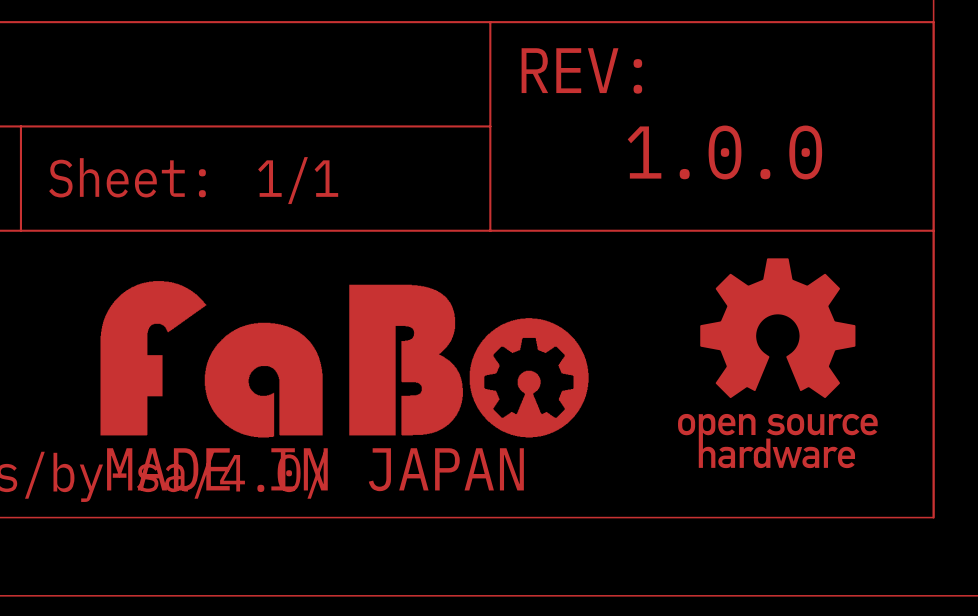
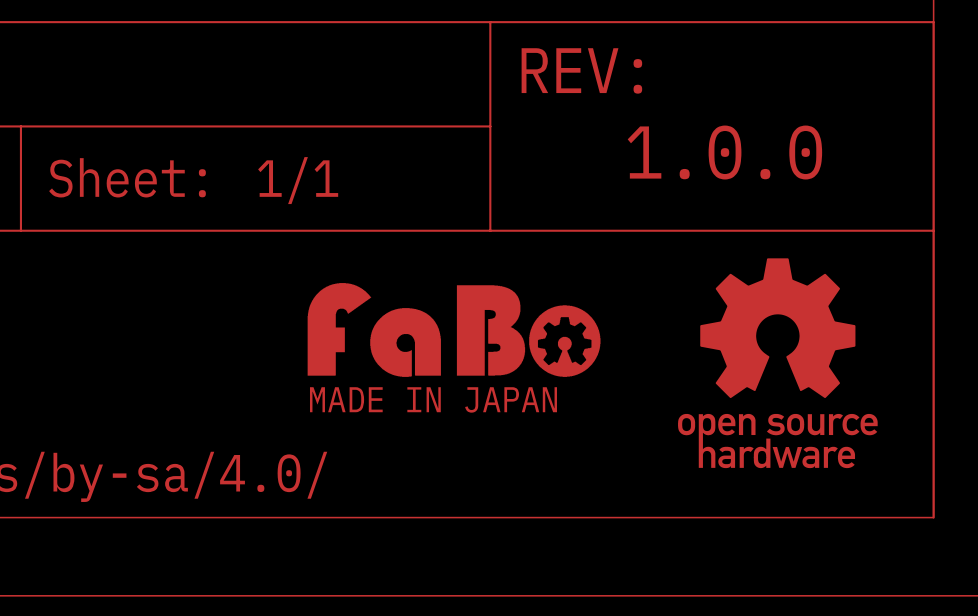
part: none -> (454, 329)
part: (344, 359) -> none

